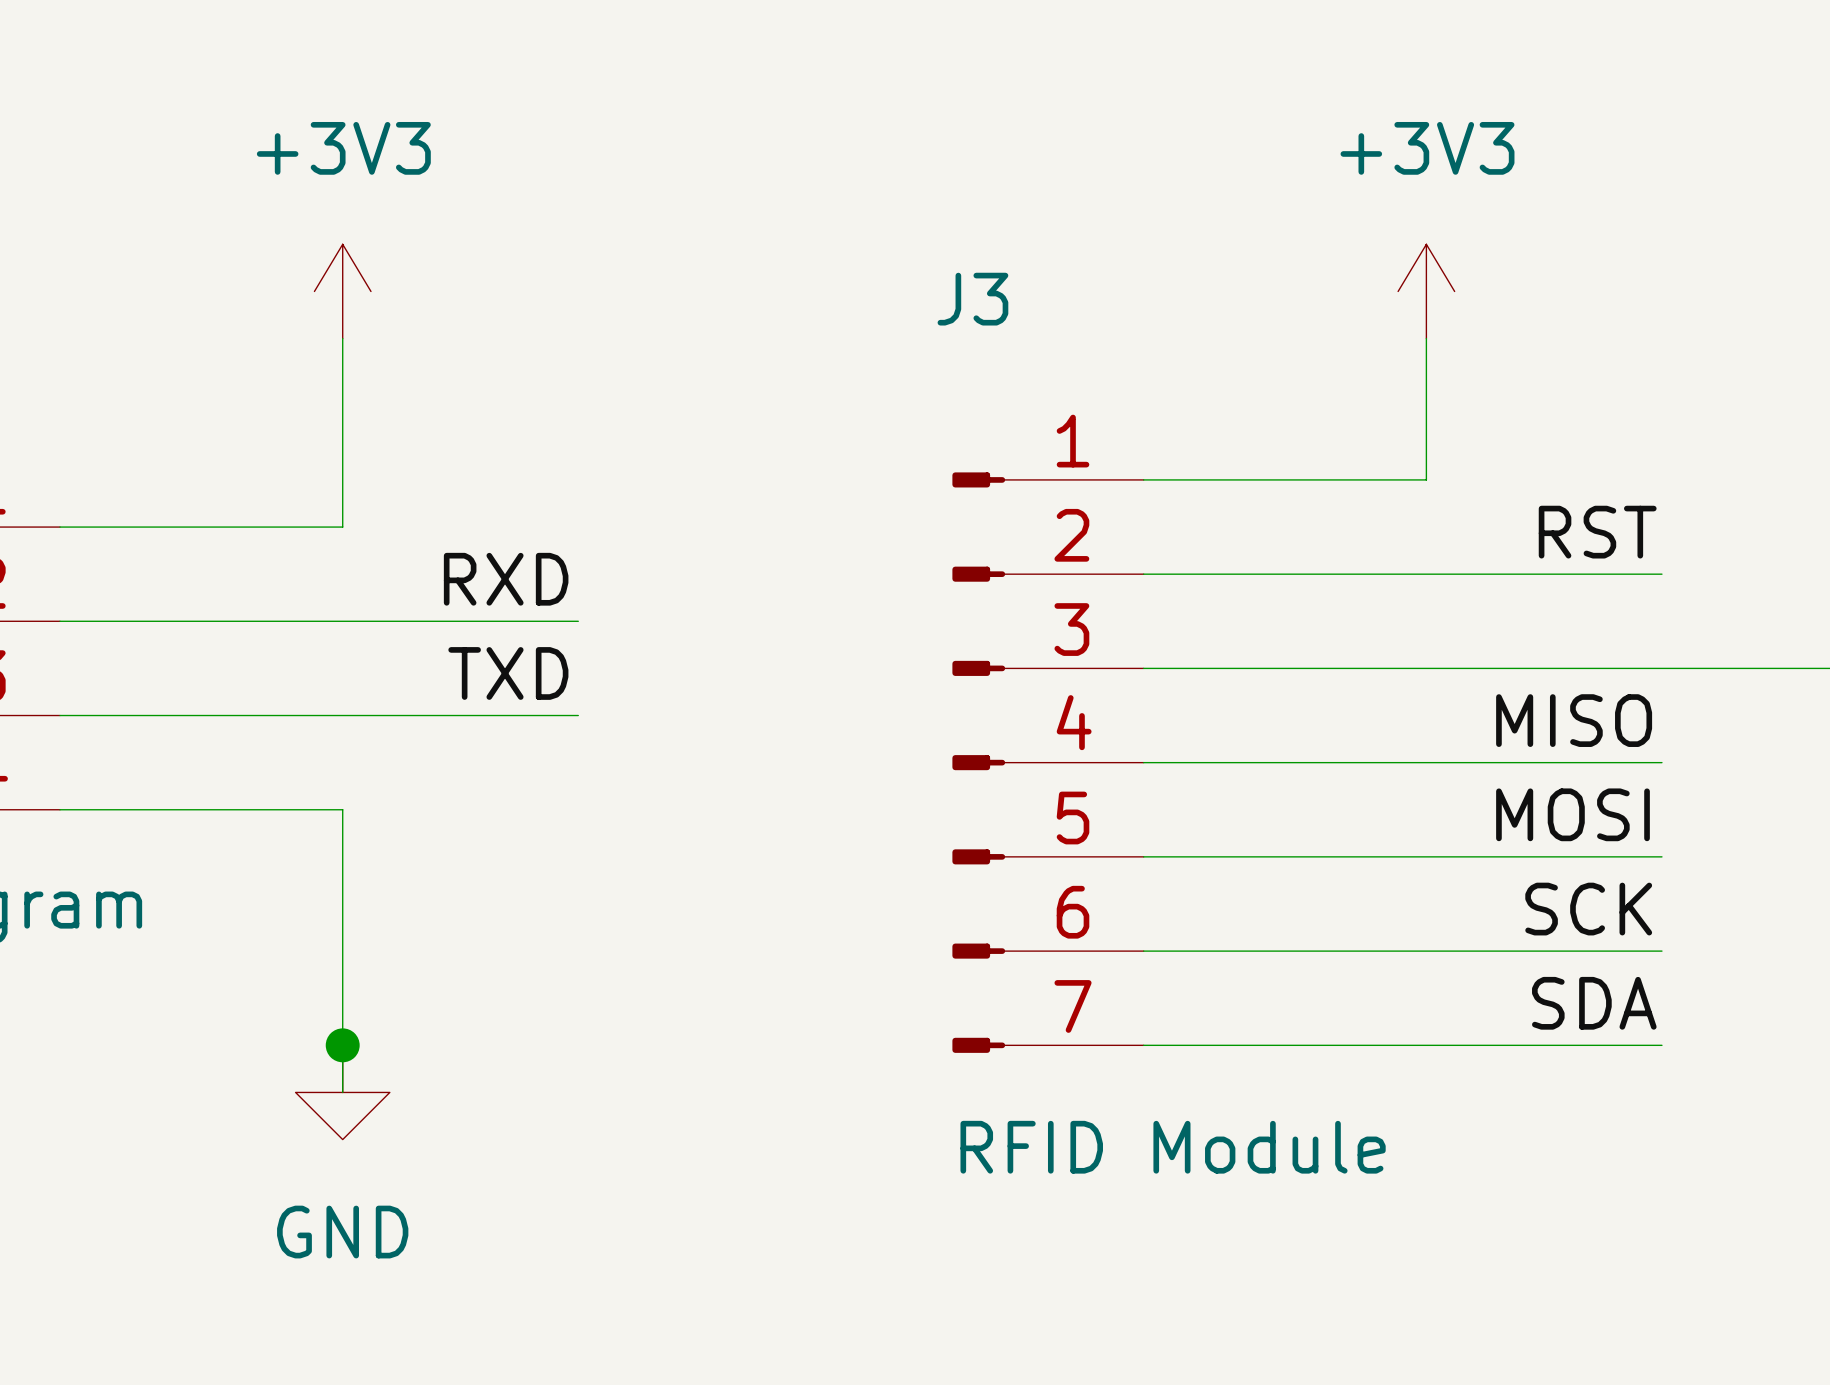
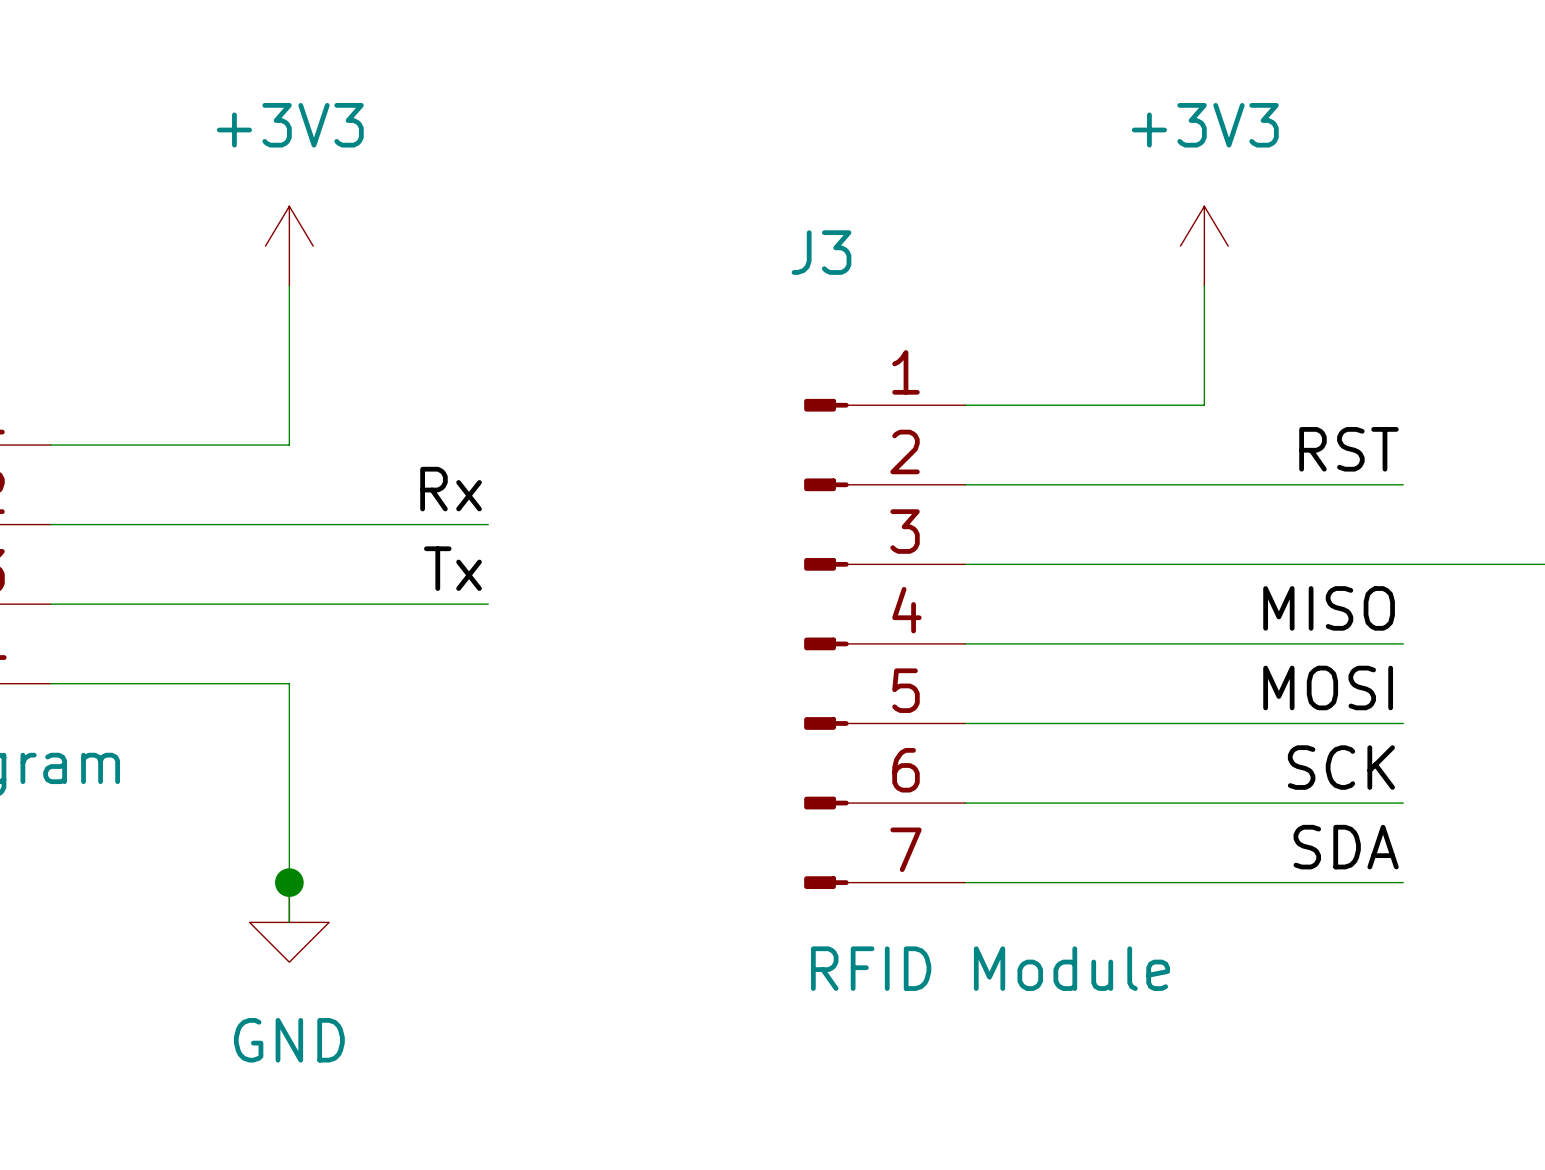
label: RXD (506, 579) -> Rx (451, 489)
label: TXD (508, 673) -> Tx (452, 568)

